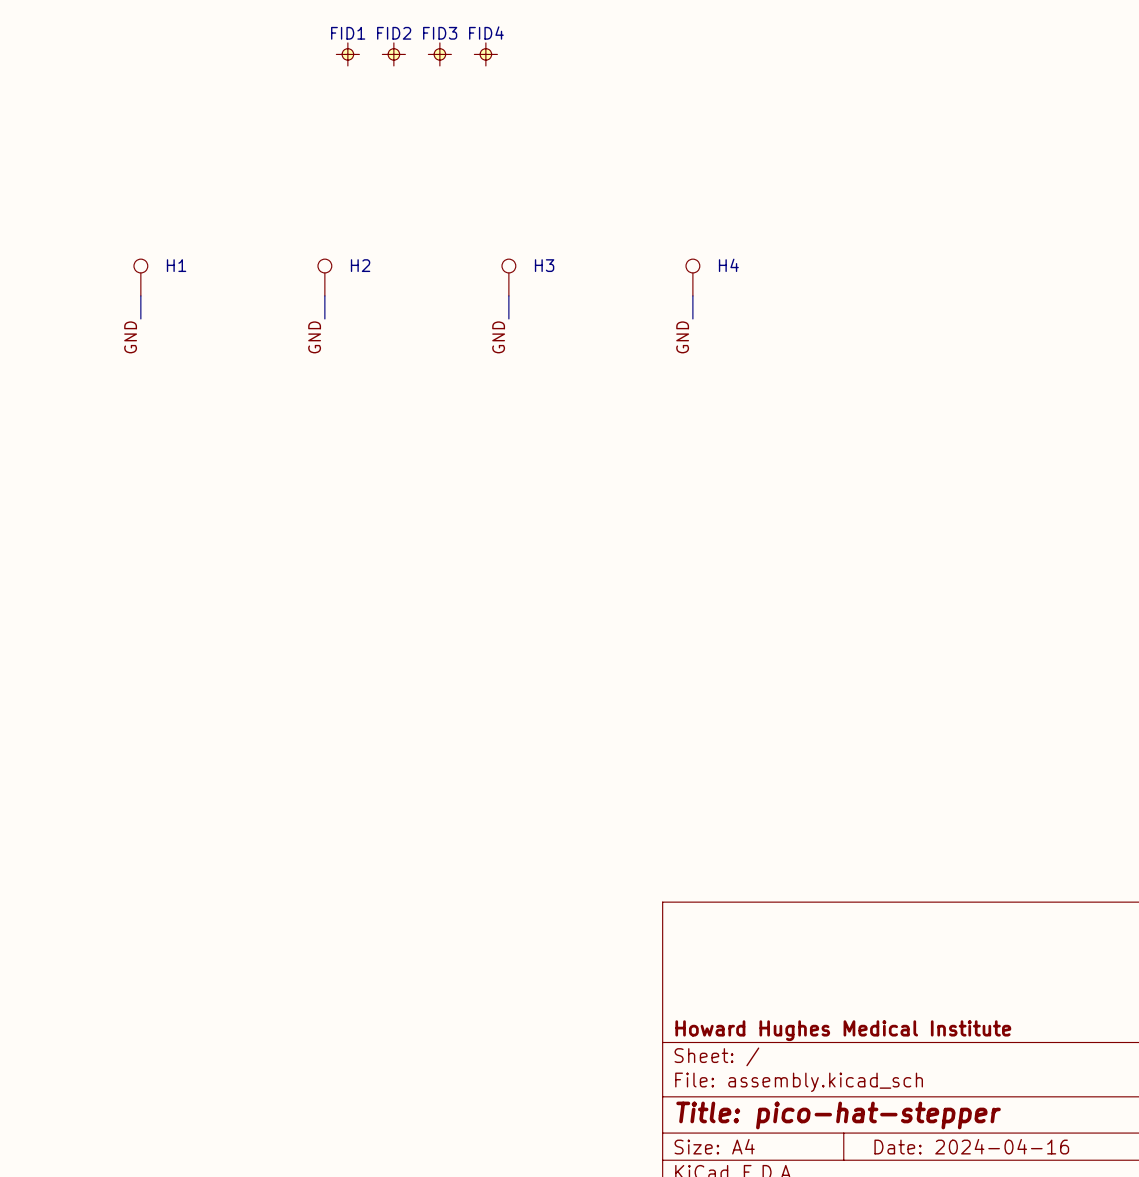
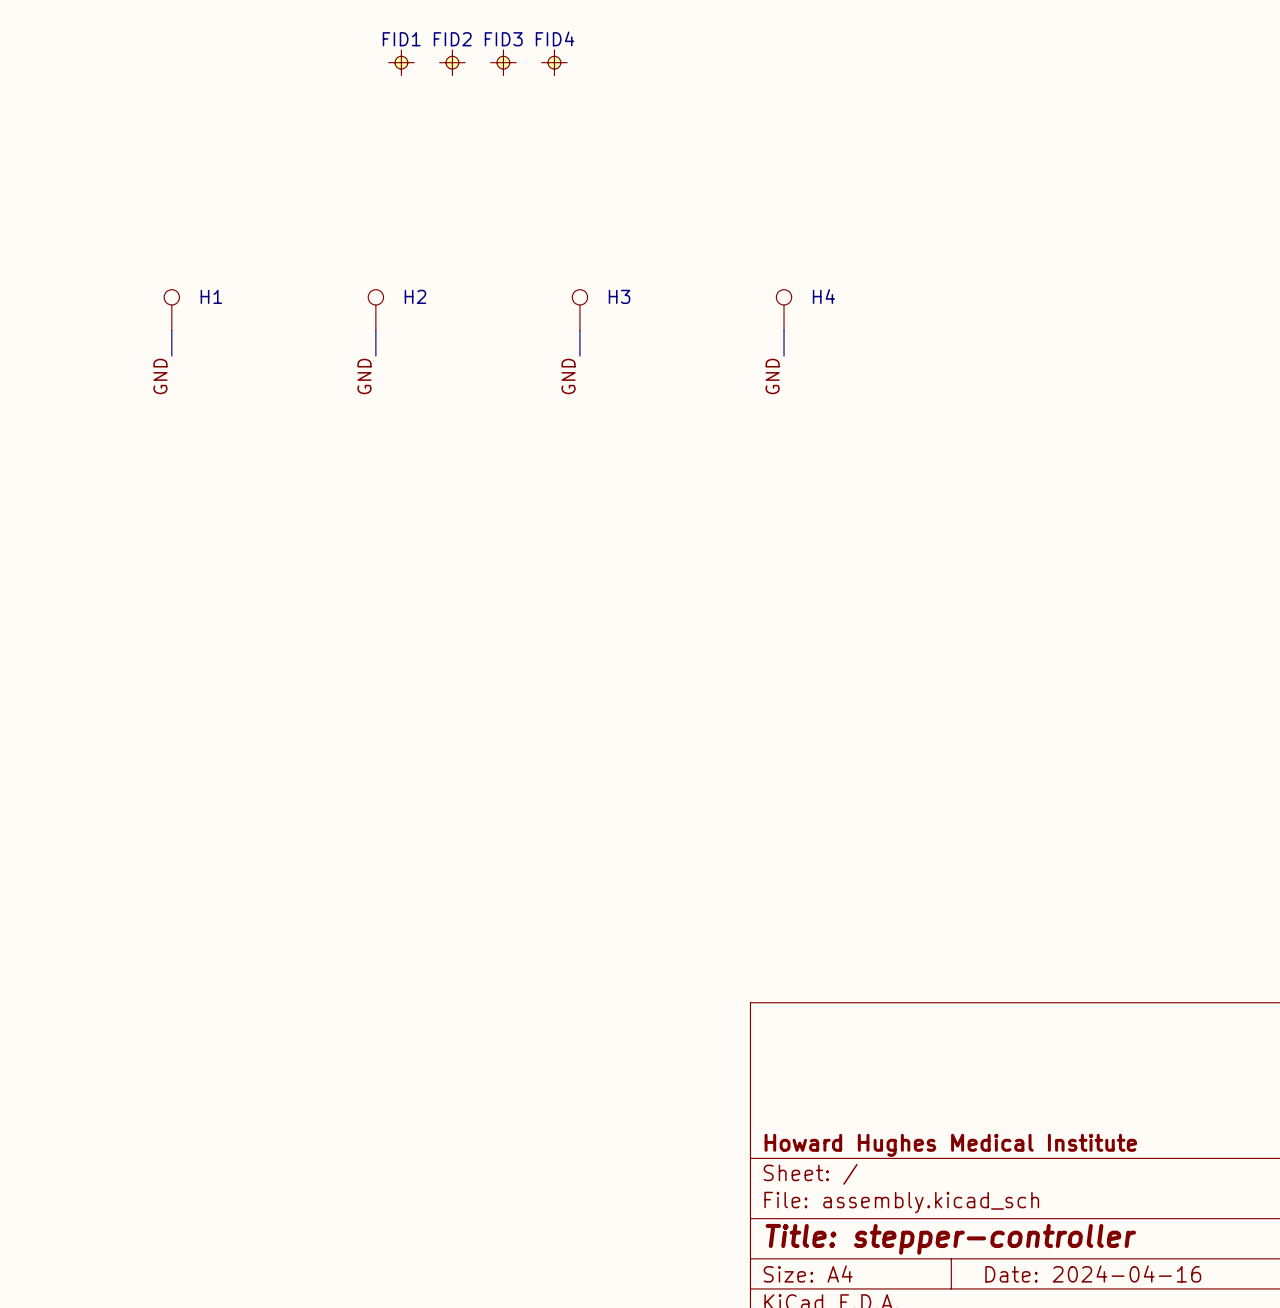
title block: Title: pico-hat-stepper (838, 1115) -> Title: stepper-controller (950, 1239)

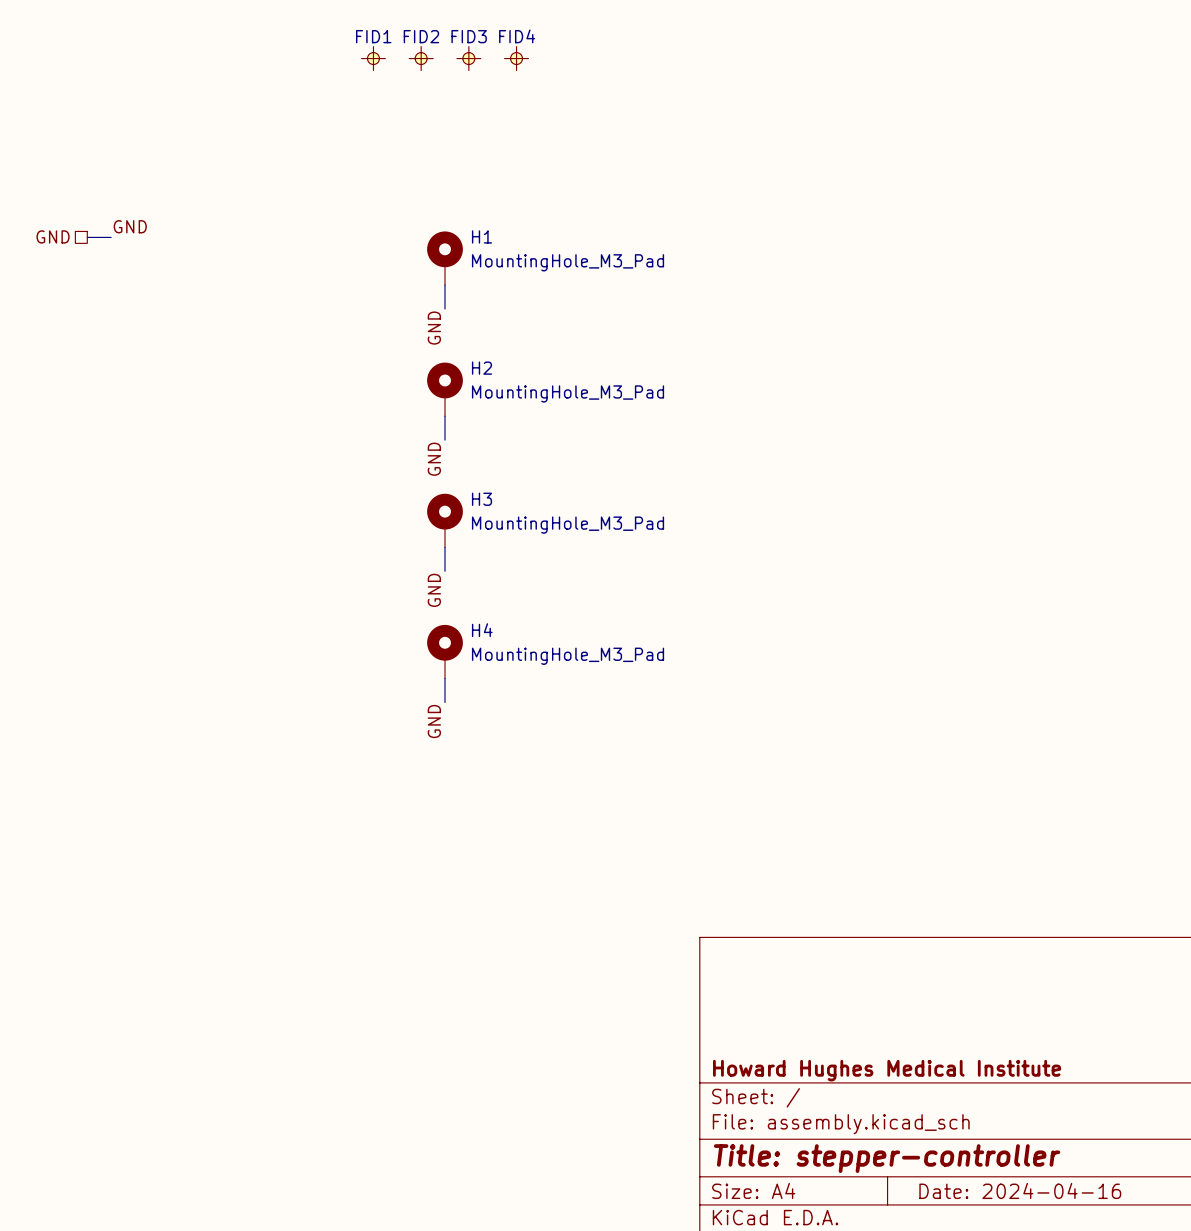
hierarchical label: none -> GND (53, 236)
wire: none -> (87, 237) (111, 237)
H1 value: none -> MountingHole_M3_Pad (568, 262)
H1 symbol: [164, 289, 180, 331] -> [427, 231, 463, 286]
H2 symbol: [368, 289, 384, 331] -> [427, 362, 463, 417]
H3 symbol: [572, 289, 588, 331] -> [427, 493, 463, 548]
H4 symbol: [776, 289, 792, 331] -> [427, 624, 463, 679]
wire: (171, 330) (171, 356) -> none
wire: (375, 330) (375, 356) -> (445, 416) (445, 440)
wire: (579, 330) (579, 356) -> (445, 285) (445, 308)
wire: (784, 330) (784, 356) -> none
label: none -> GND (434, 328)
label rotation: 0° (160, 376) -> 90° clockwise (130, 226)
label position: GND (160, 376) -> GND (130, 226)
label: GND (364, 376) -> none
label: GND (568, 376) -> none
label: GND (772, 376) -> none
H2 value: none -> MountingHole_M3_Pad (568, 393)
label: none -> GND (434, 459)
H3 value: none -> MountingHole_M3_Pad (568, 525)
wire: none -> (445, 547) (445, 571)
label: none -> GND (434, 590)
H4 value: none -> MountingHole_M3_Pad (568, 656)
wire: none -> (445, 678) (445, 702)
label: none -> GND (434, 721)

